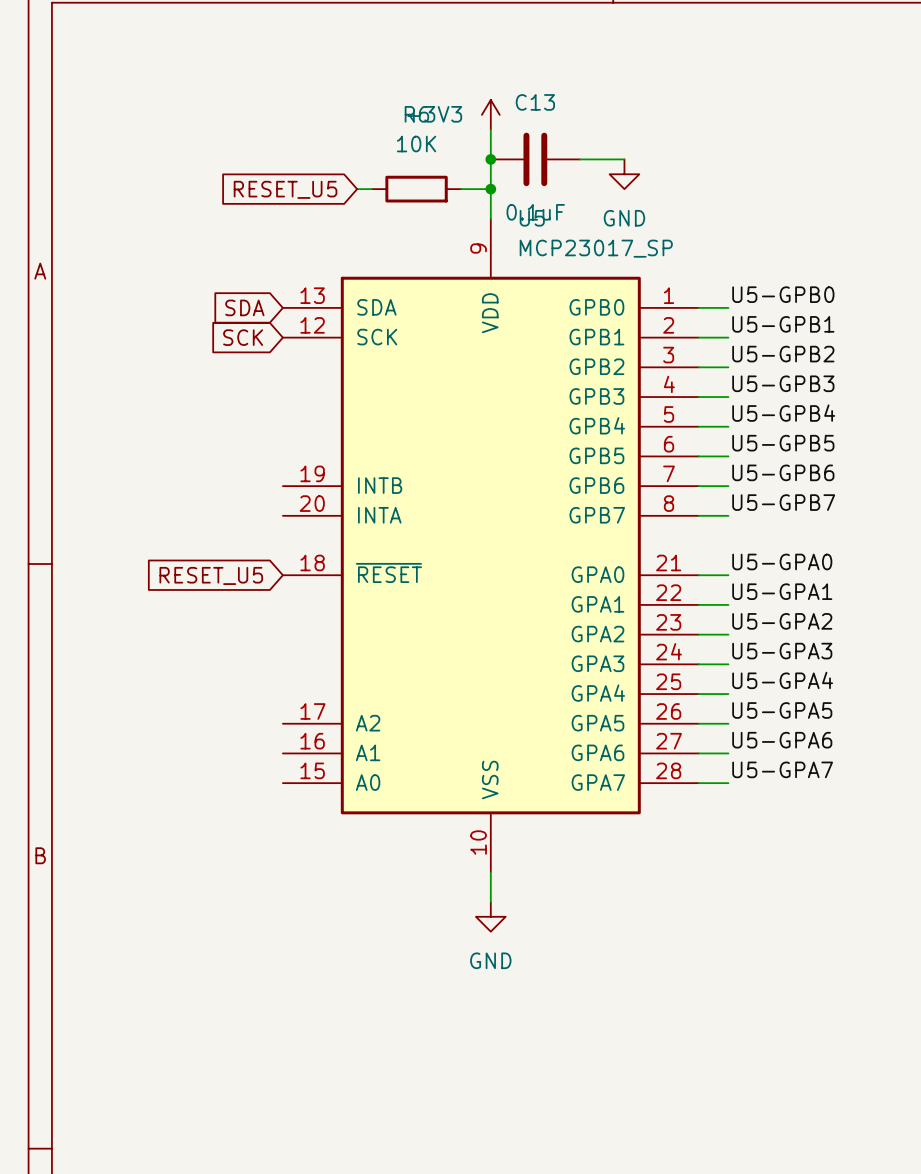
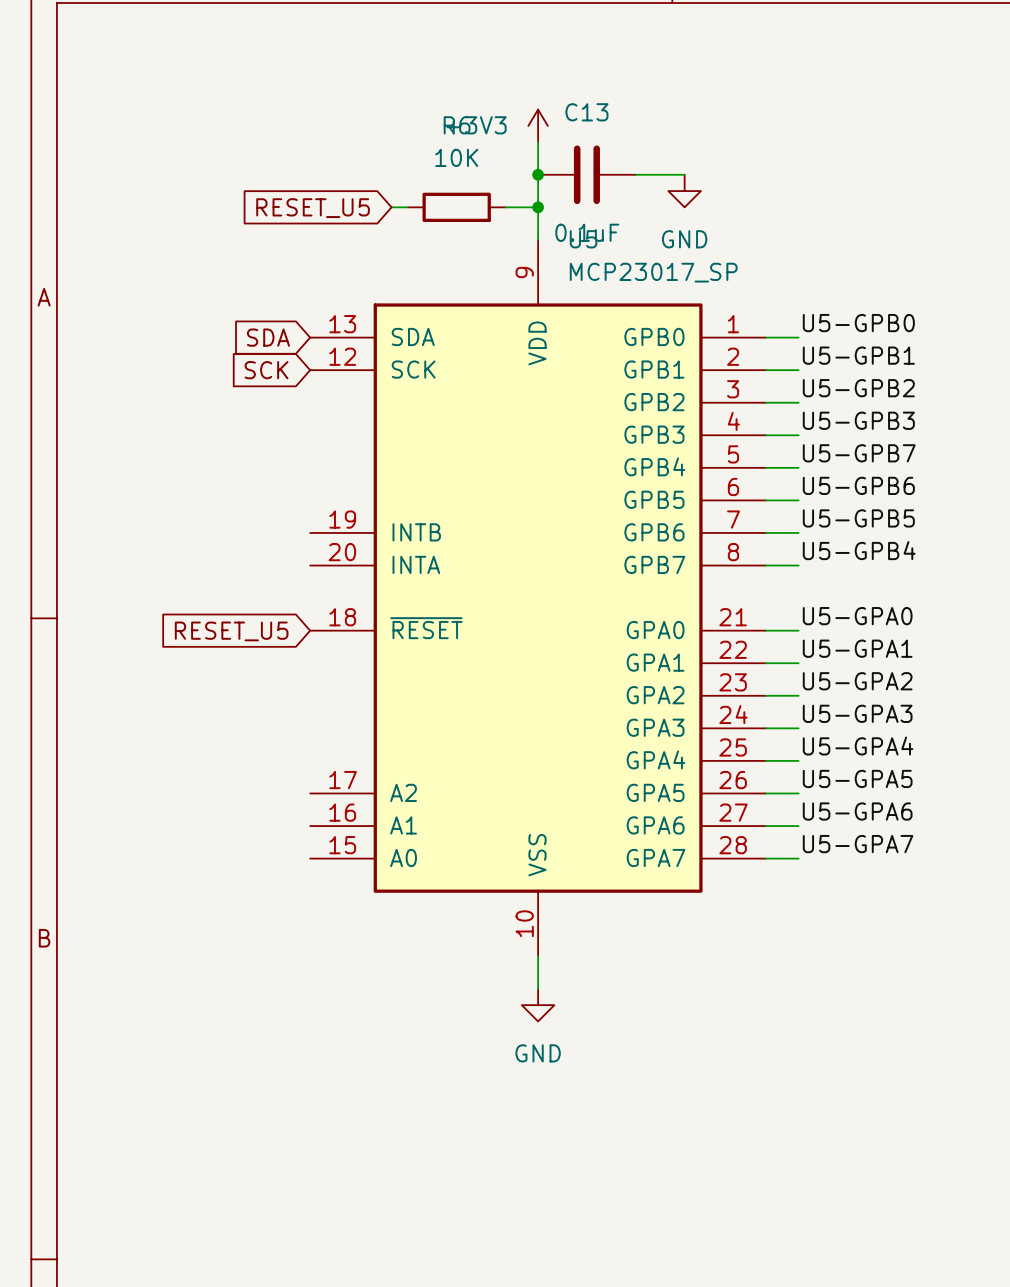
label: U5-GPB4 (783, 413) -> U5-GPB7 (859, 453)
label: U5-GPB5 (783, 443) -> U5-GPB6 (858, 485)
label: U5-GPB6 (783, 472) -> U5-GPB5 (858, 518)
label: U5-GPB7 (783, 502) -> U5-GPB4 (859, 550)

